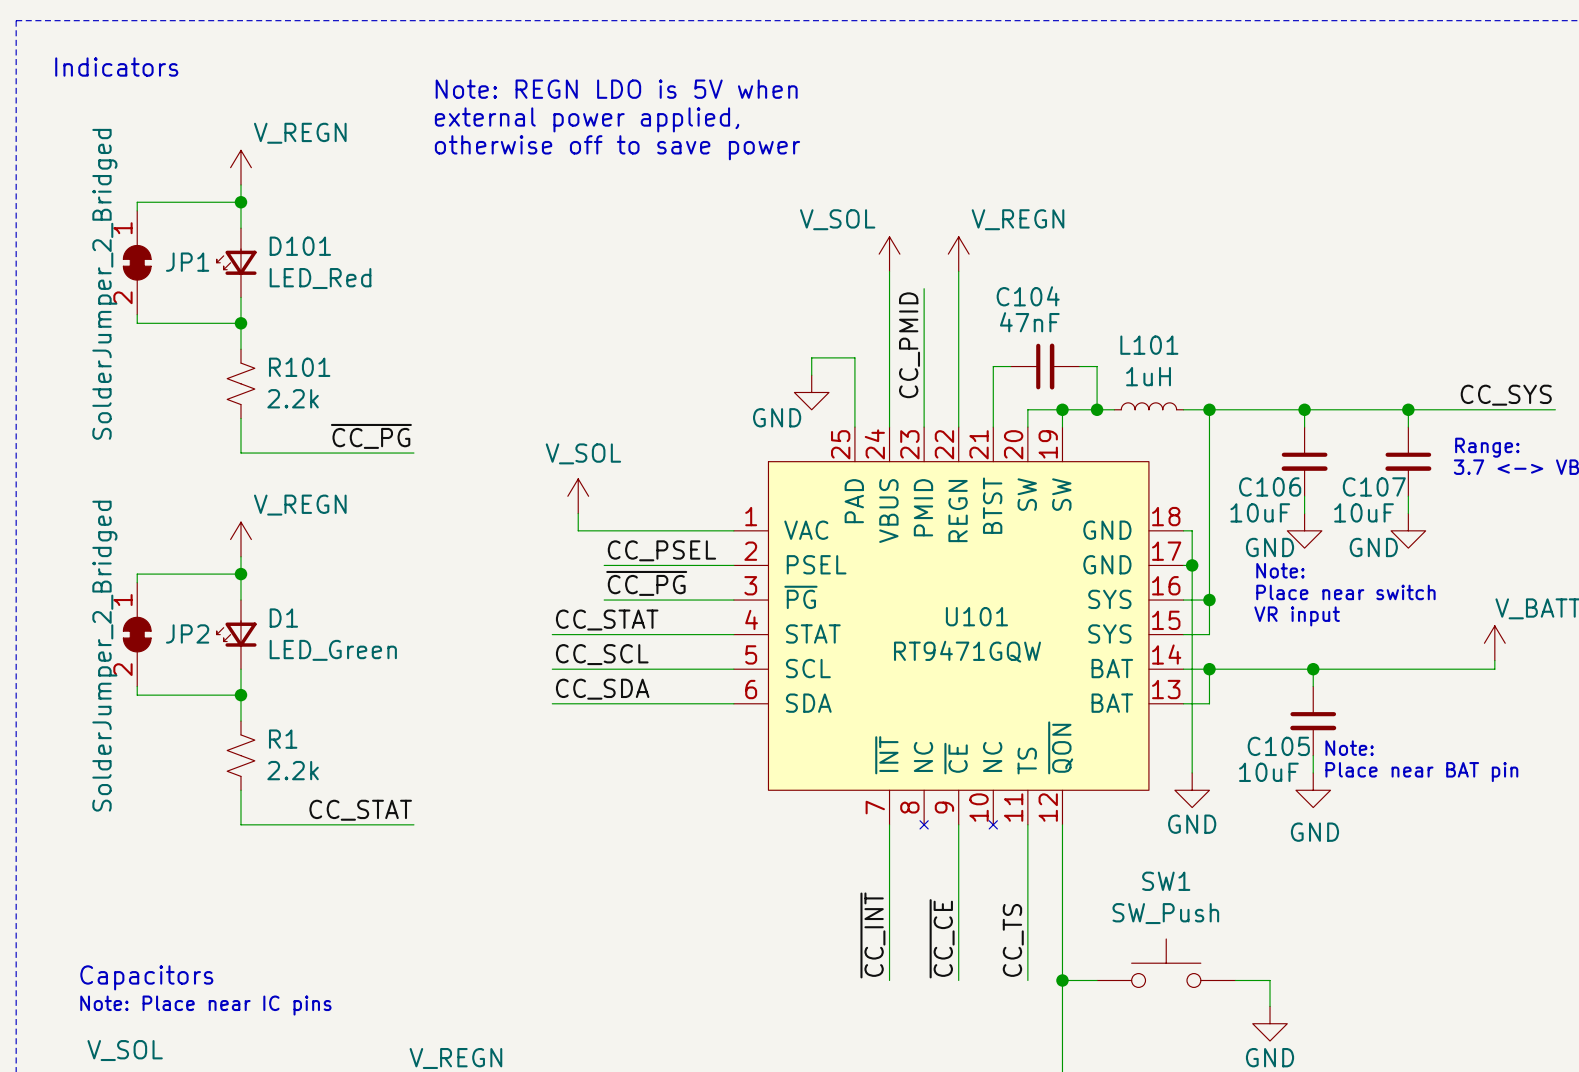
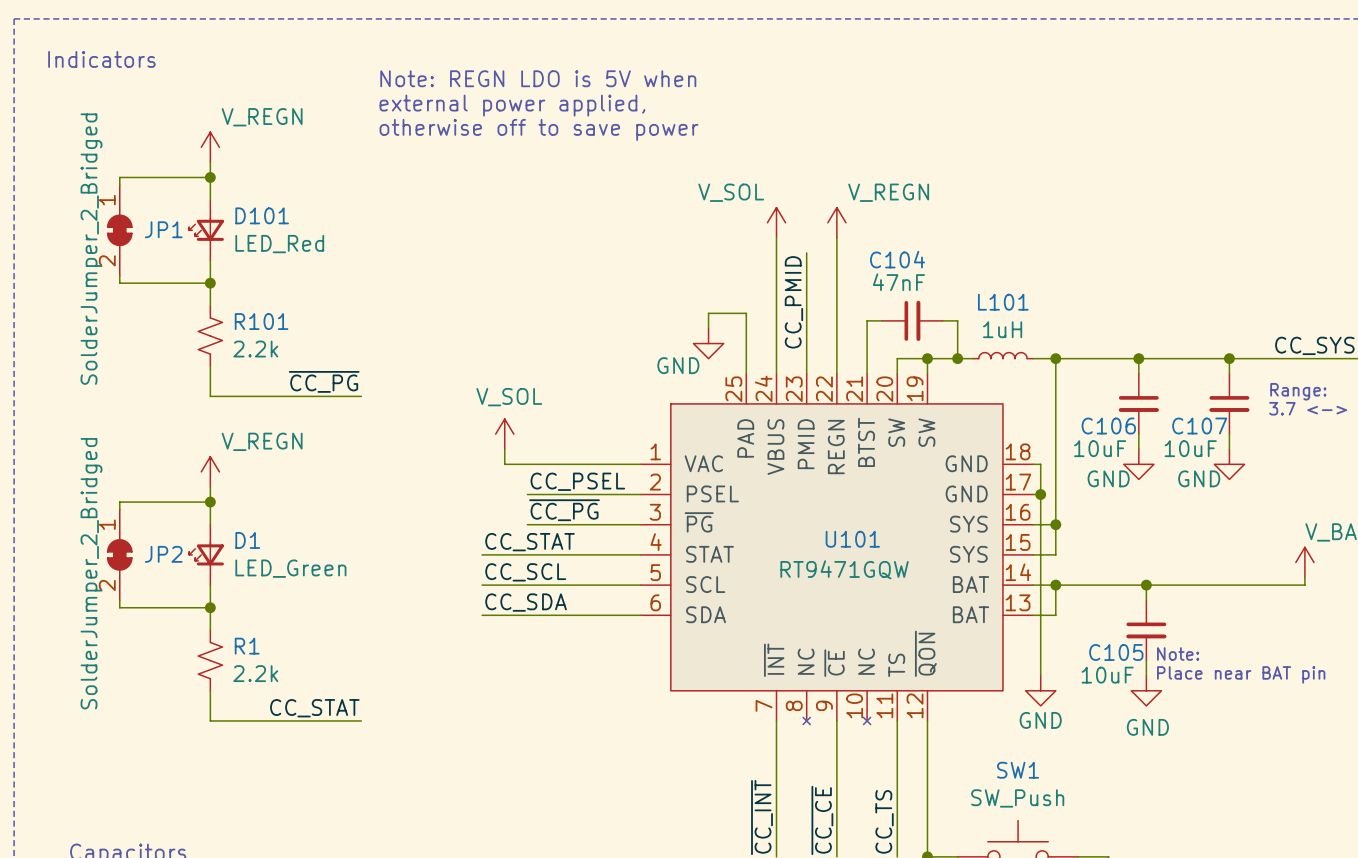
text: Note: (1280, 570) -> none
text: Place near switch (1345, 592) -> none
text: VR input (1297, 616) -> none

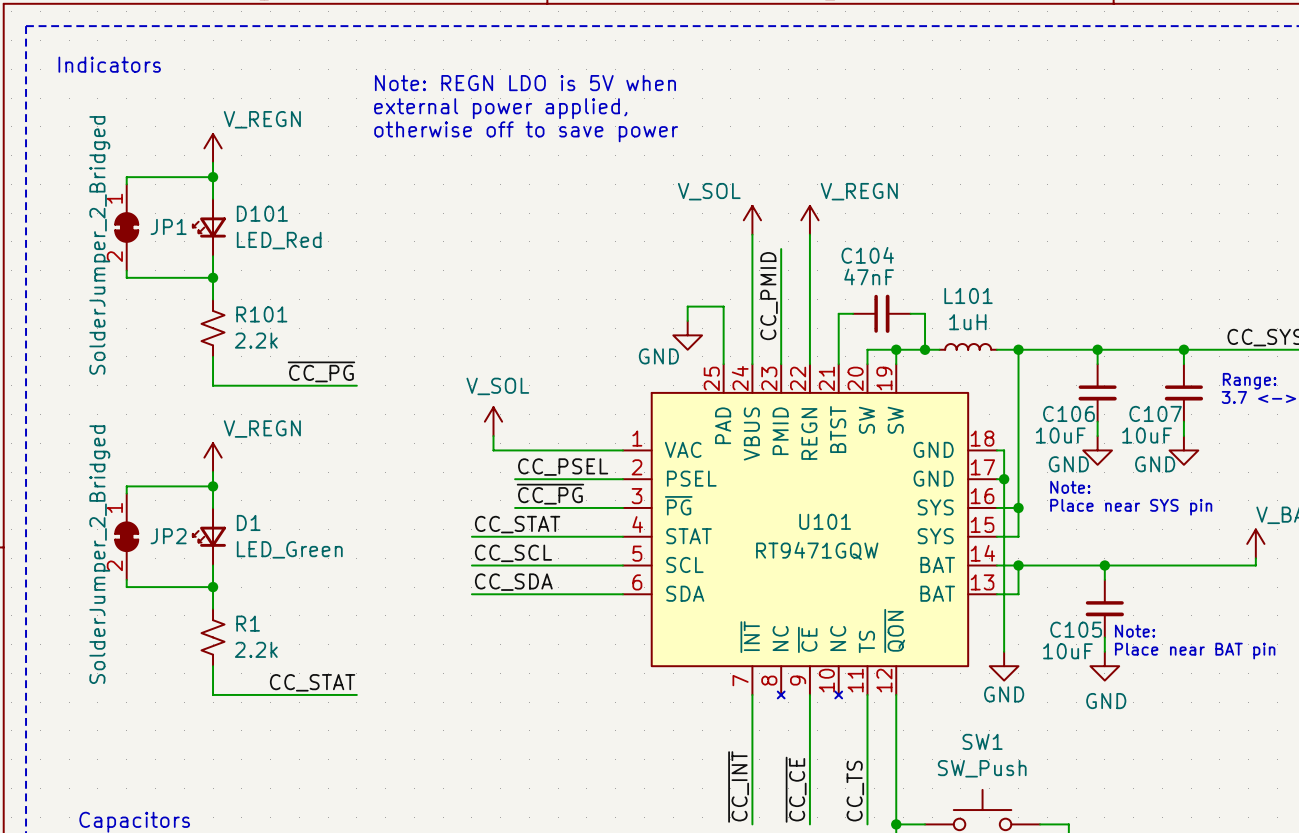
text: none -> Note: (1070, 487)
text: none -> Place near SYS pin (1131, 507)

